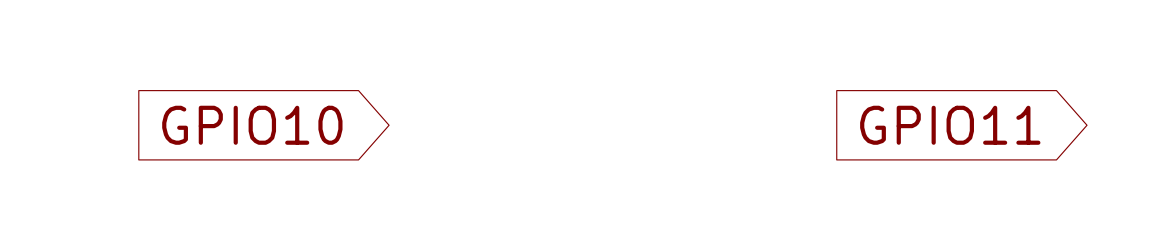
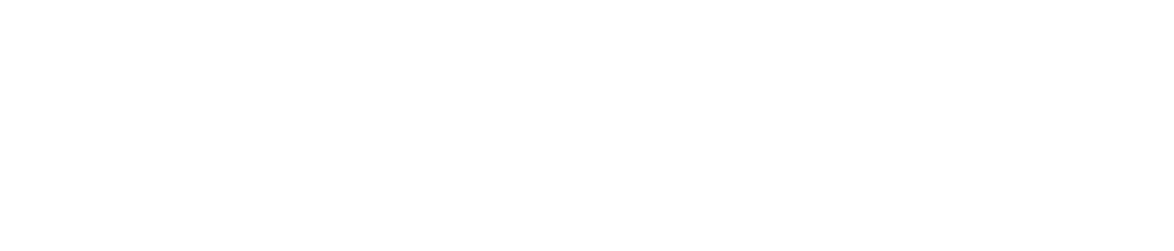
global label: GPIO10 (252, 125) -> none
global label: GPIO11 (950, 125) -> none

